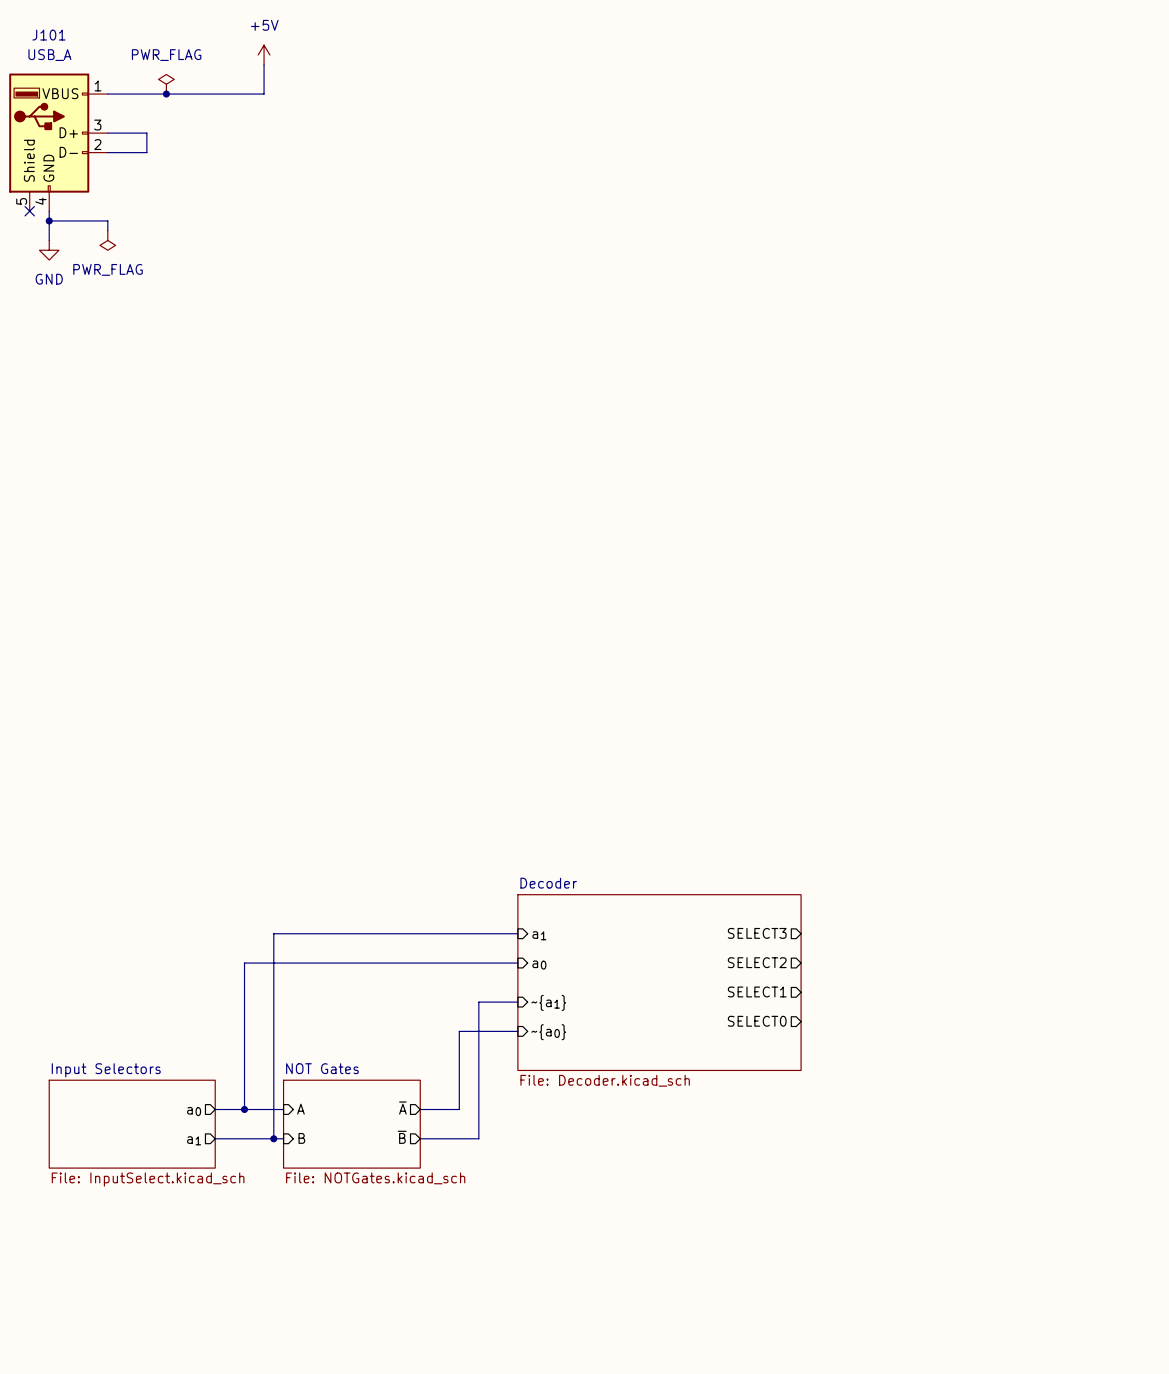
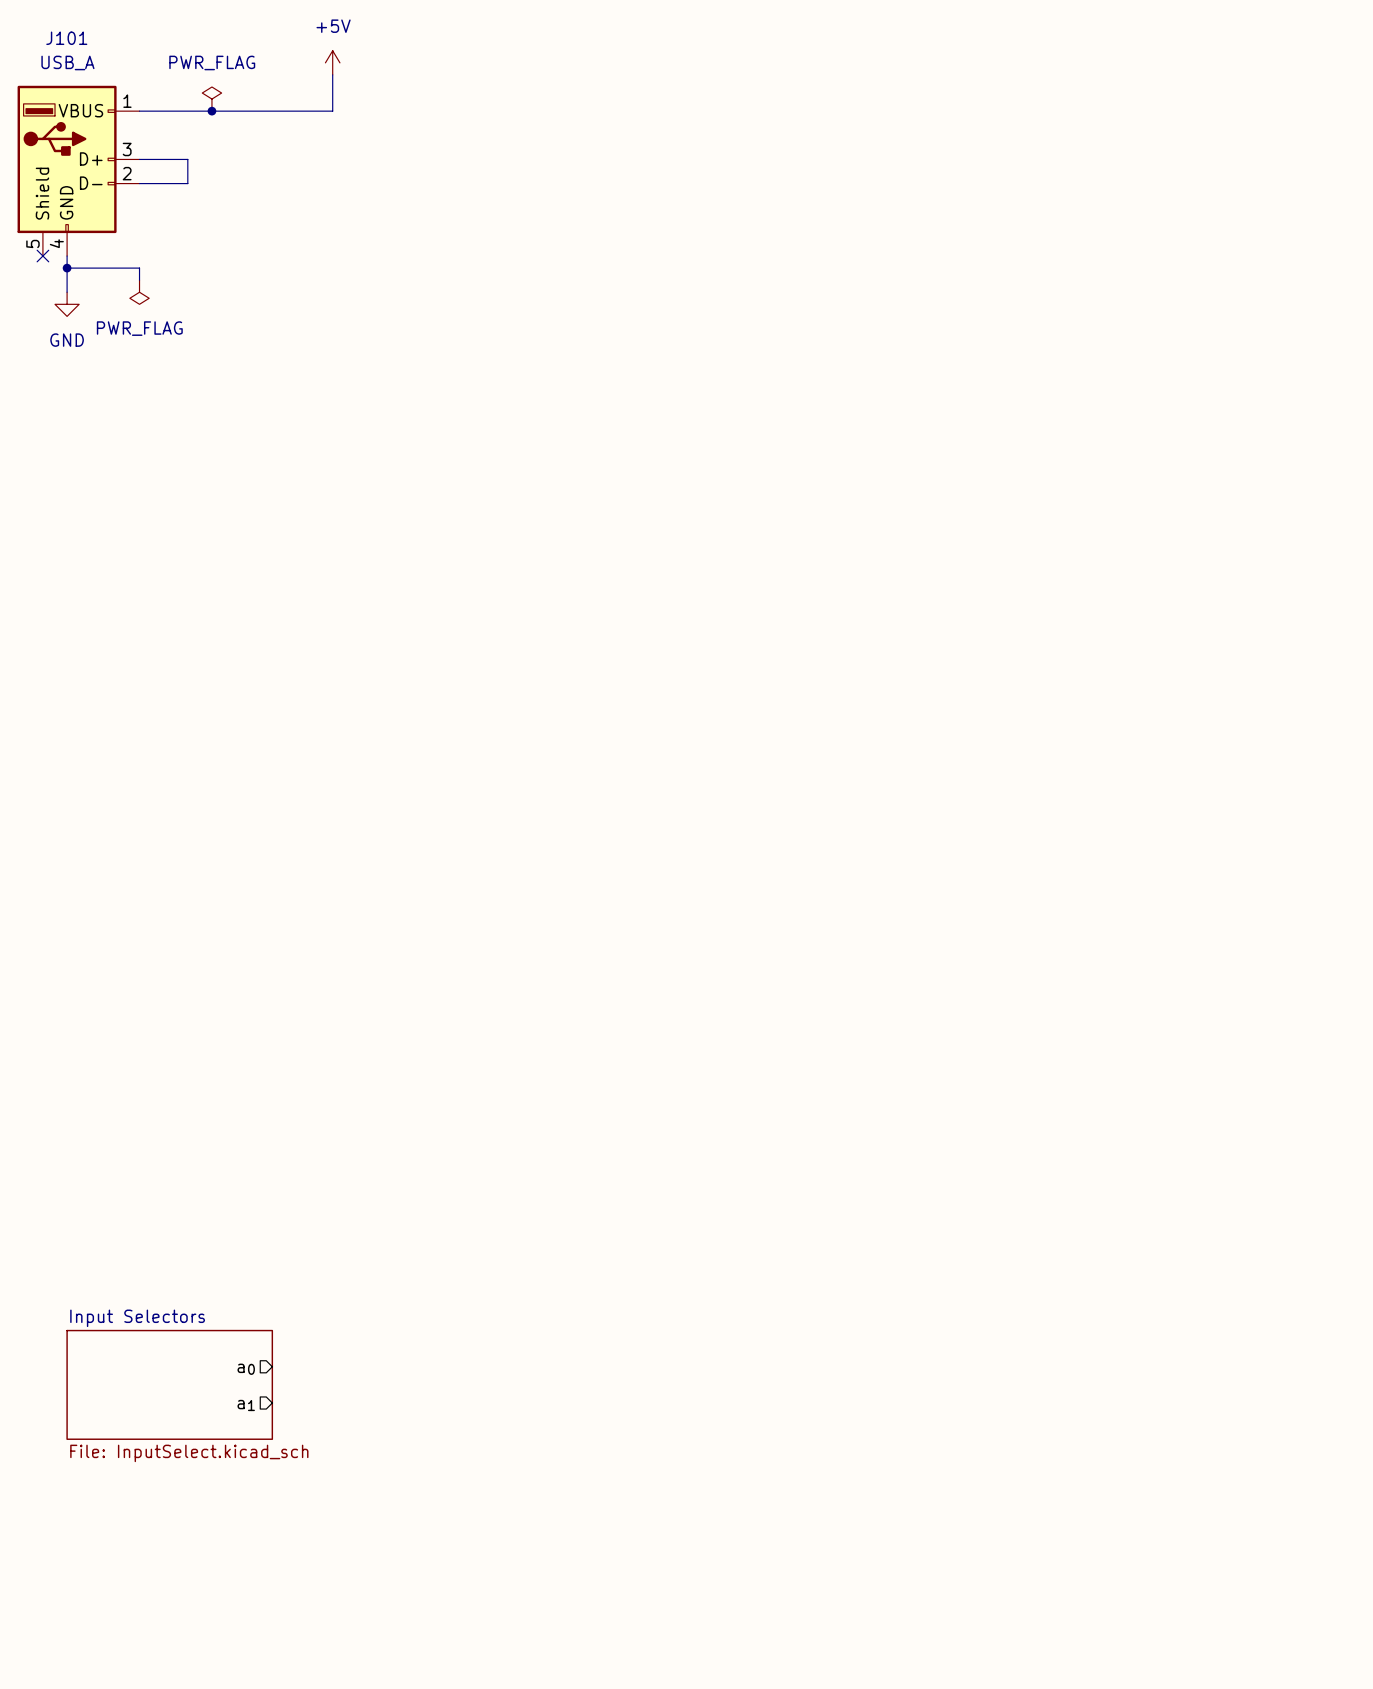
wire: (517, 933) (273, 933) (273, 1138) -> none
sheet pin: SELECT3 (757, 933) -> none
sheet pin: a1 (539, 935) -> none
sheet pin: SELECT2 (757, 962) -> none
wire: (517, 963) (244, 963) (244, 1109) -> none
sheet pin: a0 (539, 965) -> none
sheet Decoder: File: Decoder.kicad_sch (659, 982) -> none
sheet pin: SELECT1 (757, 991) -> none
wire: (517, 1002) (478, 1002) (478, 1138) (420, 1138) -> none
sheet pin: ~{a1} (548, 1002) -> none
sheet pin: SELECT0 (757, 1021) -> none
wire: (517, 1031) (459, 1031) (459, 1109) (420, 1109) -> none
sheet pin: ~{a0} (548, 1032) -> none
sheet pin: ~{A} (402, 1108) -> none
wire: (215, 1109) (283, 1109) -> none
junction: (244, 1109) -> none
sheet pin: A (300, 1109) -> none
sheet NOT Gates: File: NOTGates.kicad_sch (351, 1124) -> none
sheet pin: ~{B} (402, 1137) -> none
wire: (215, 1138) (283, 1138) -> none
junction: (273, 1138) -> none
sheet pin: B (301, 1138) -> none

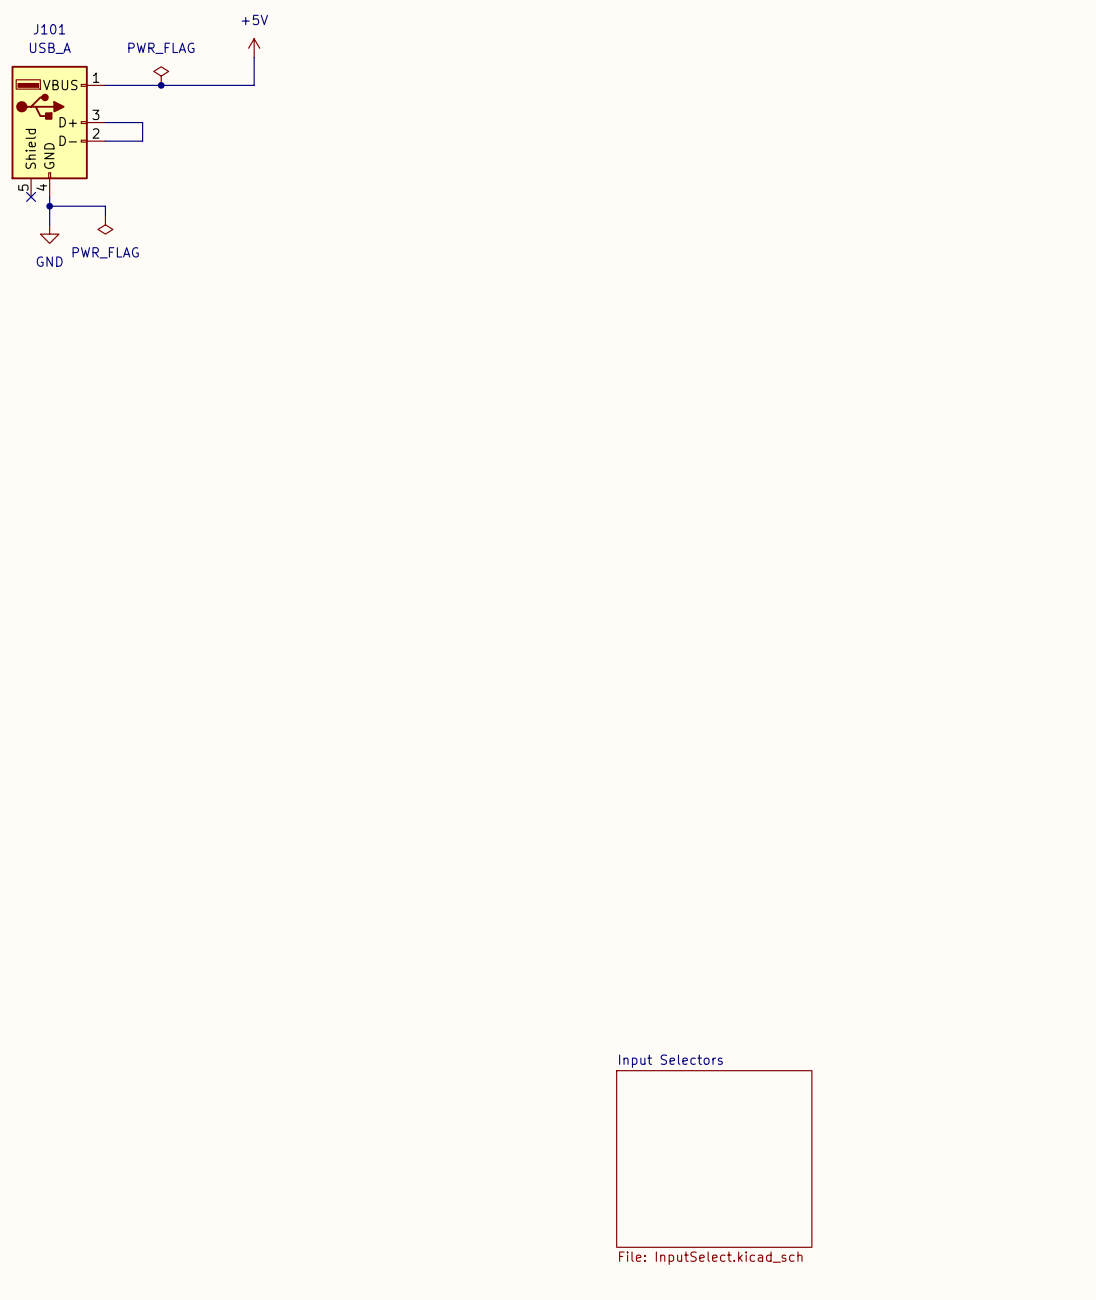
sheet pin: a0 (246, 1369) -> none
sheet Input Selectors: File: InputSelect.kicad_sch (169, 1384) -> none
sheet pin: a1 (246, 1405) -> none
sheet Input Selectors: none -> File: InputSelect.kicad_sch (714, 1158)

